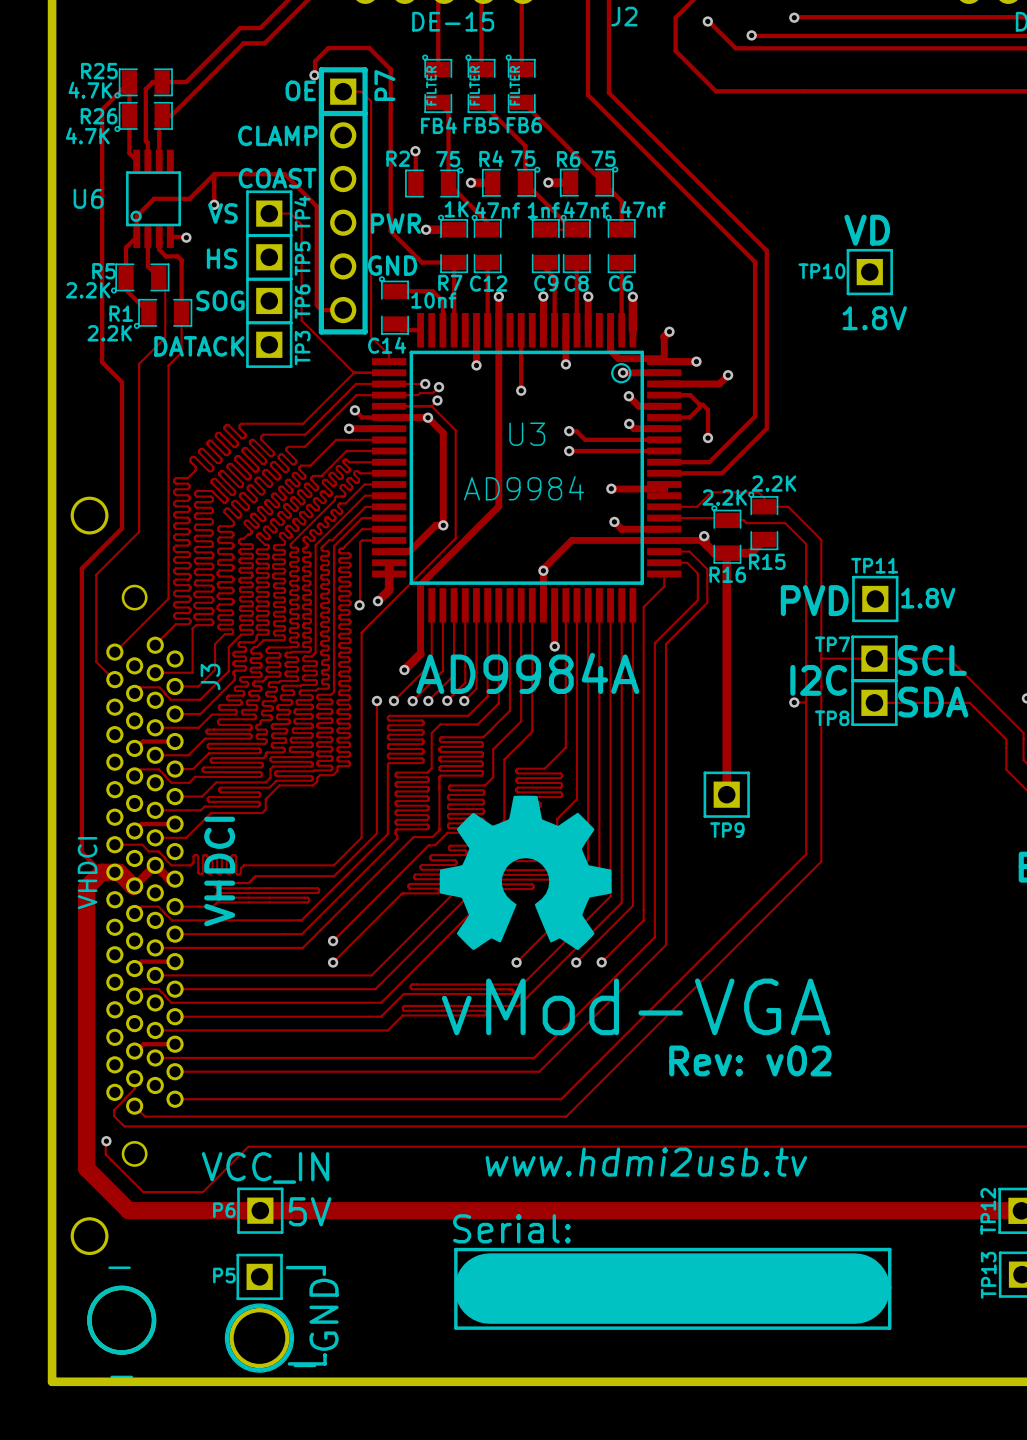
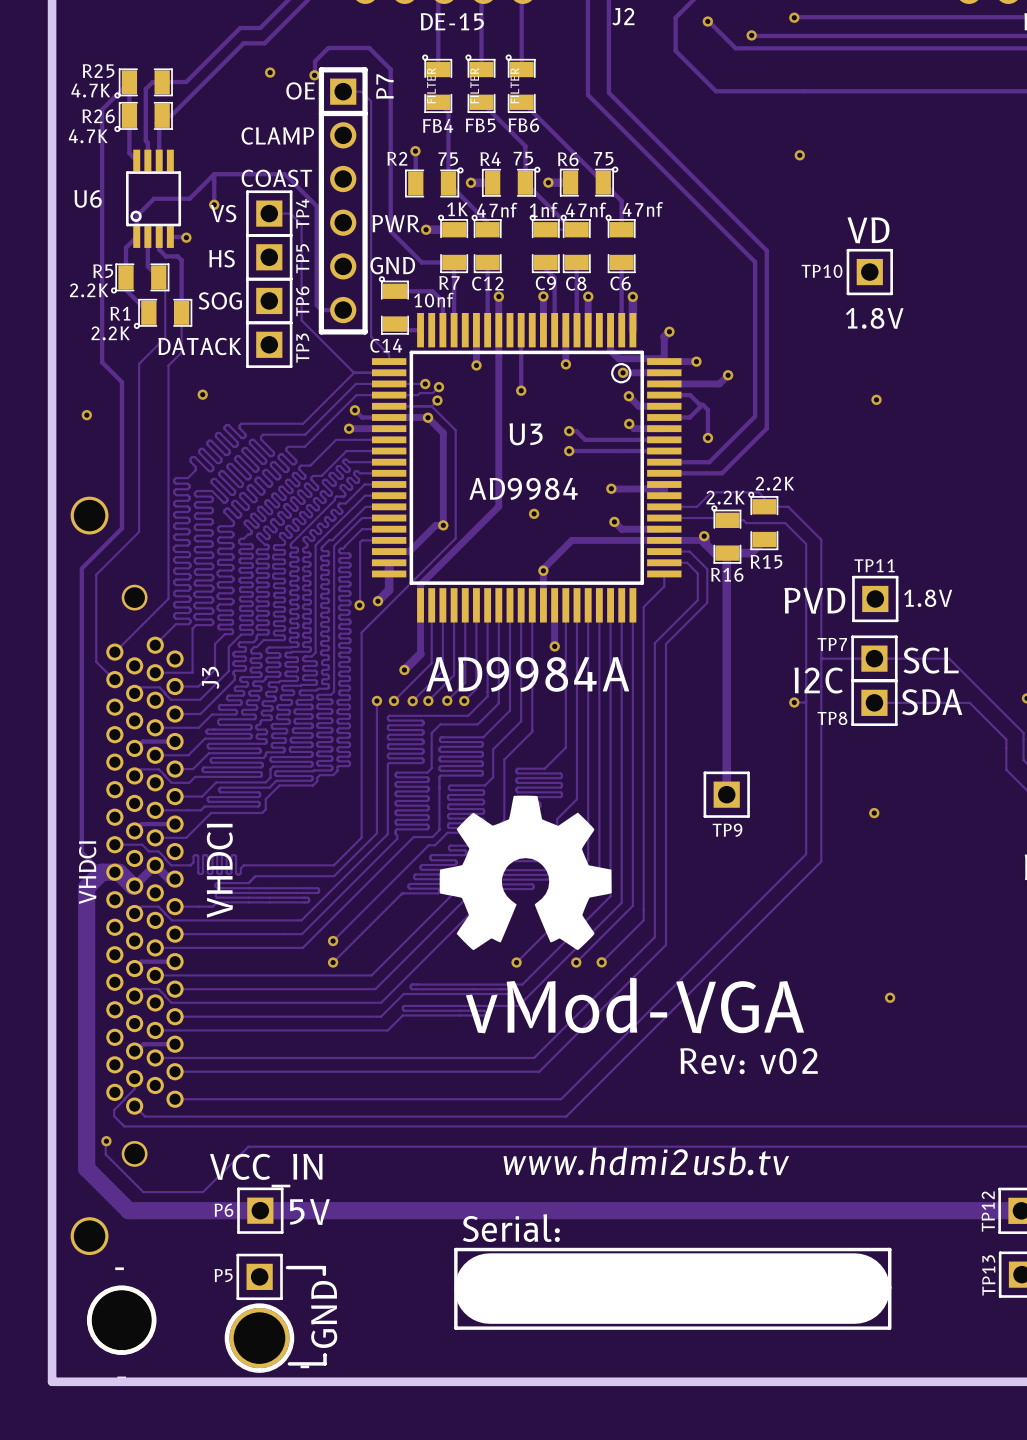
via: none -> (270, 72)
via: none -> (799, 155)
via: none -> (202, 394)
via: none -> (876, 399)
via: none -> (86, 415)
via: none -> (534, 513)
via: none -> (874, 813)
via: none -> (890, 997)

